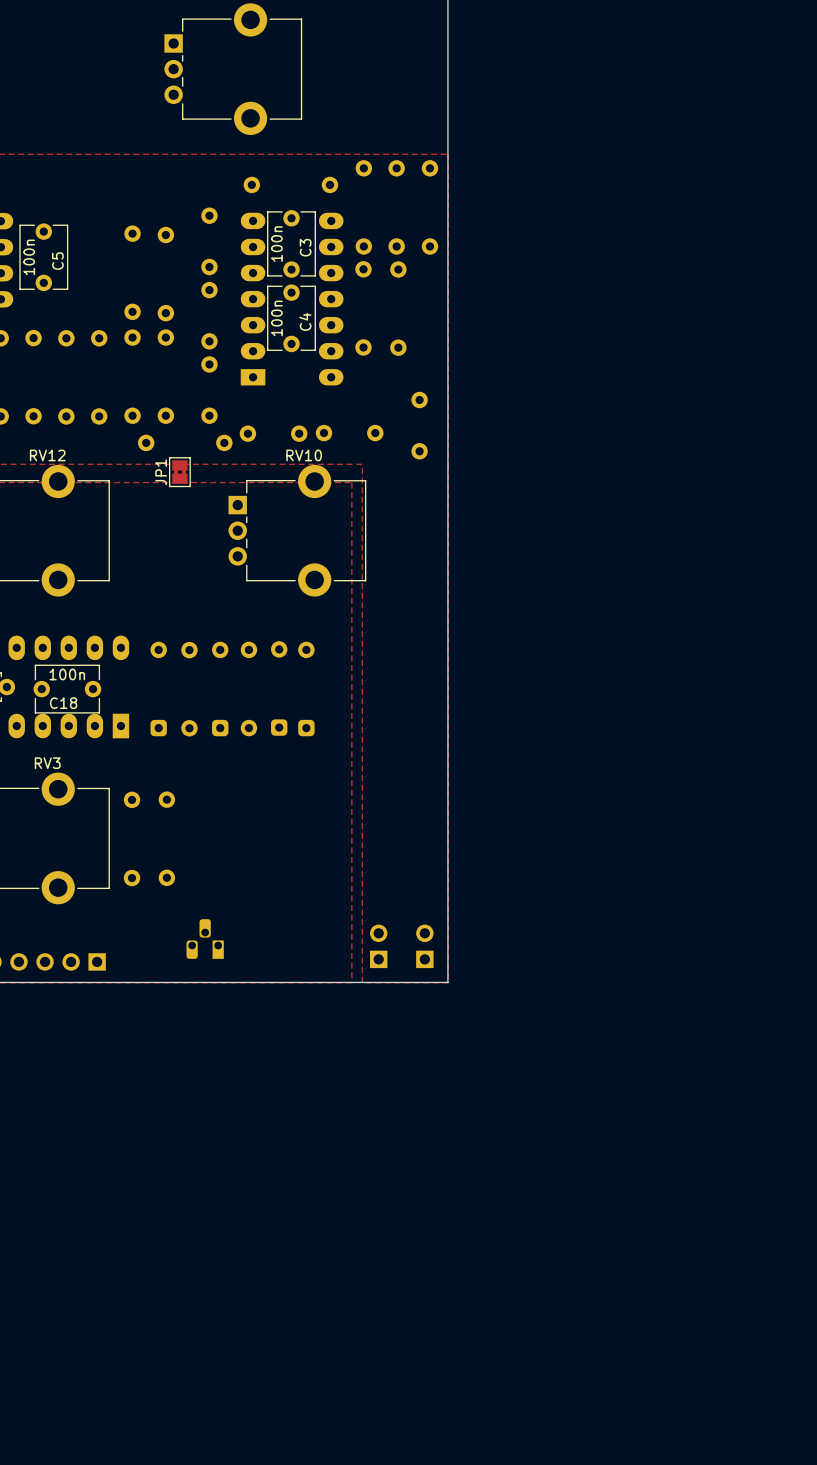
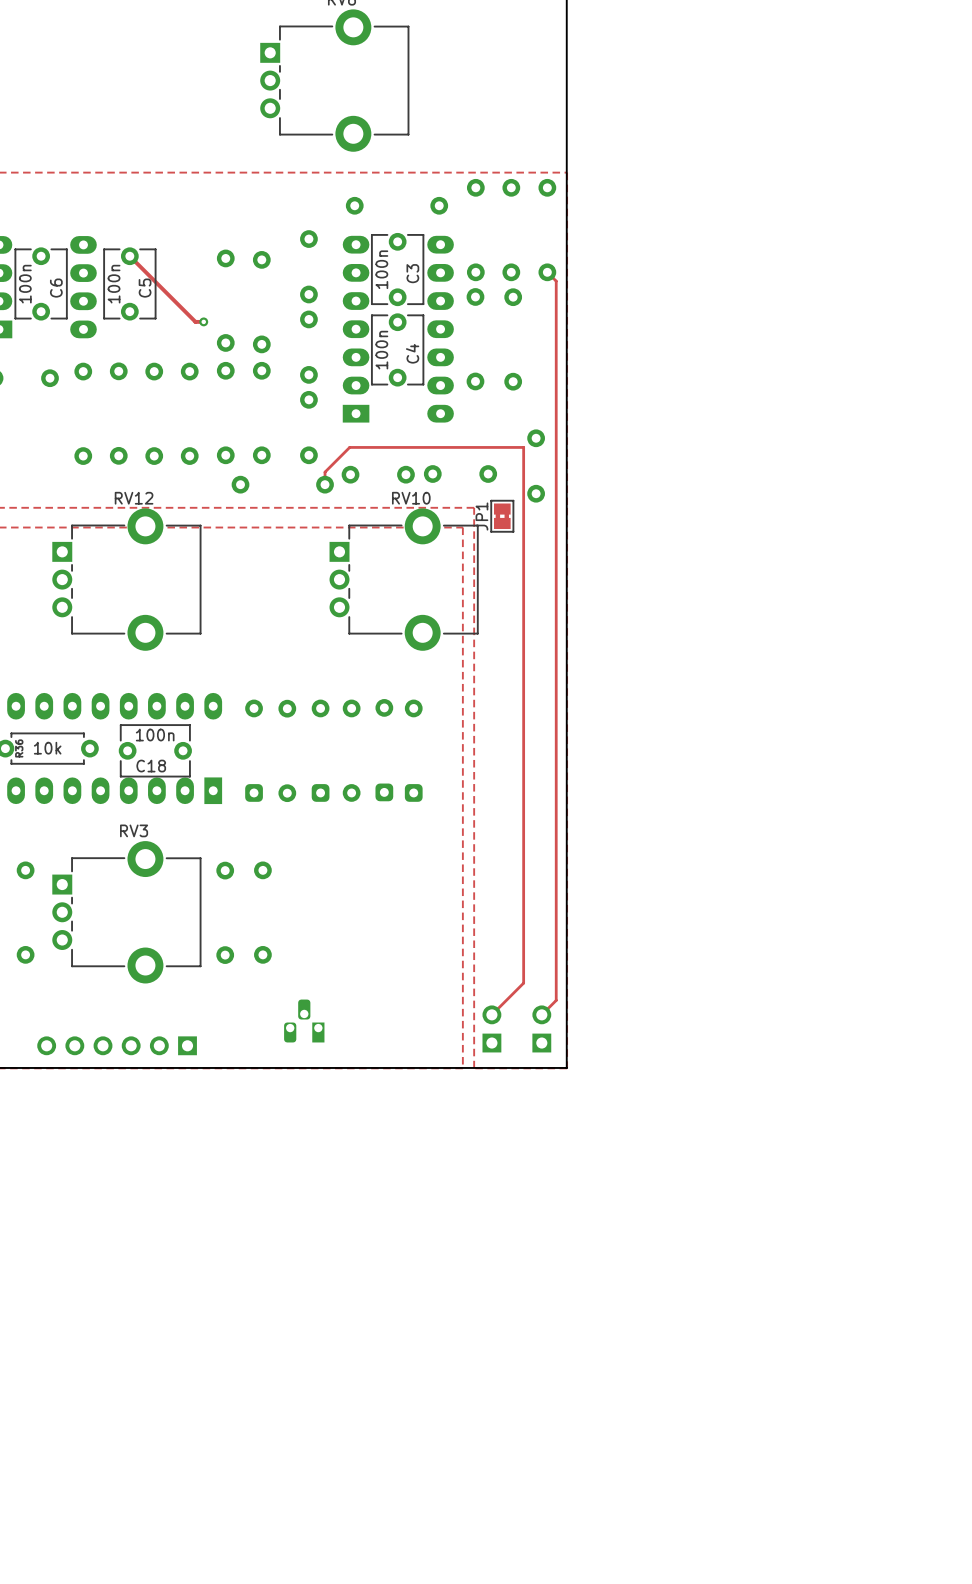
track: none -> (129, 256) (195, 321) (203, 321)
track: none -> (547, 272) (556, 281) (556, 1000) (541, 1014)
via: none -> (203, 321)
track: none -> (325, 484) (325, 472) (349, 447) (523, 447) (523, 983) (491, 1014)
JP1 position: (179, 472) -> (502, 516)

